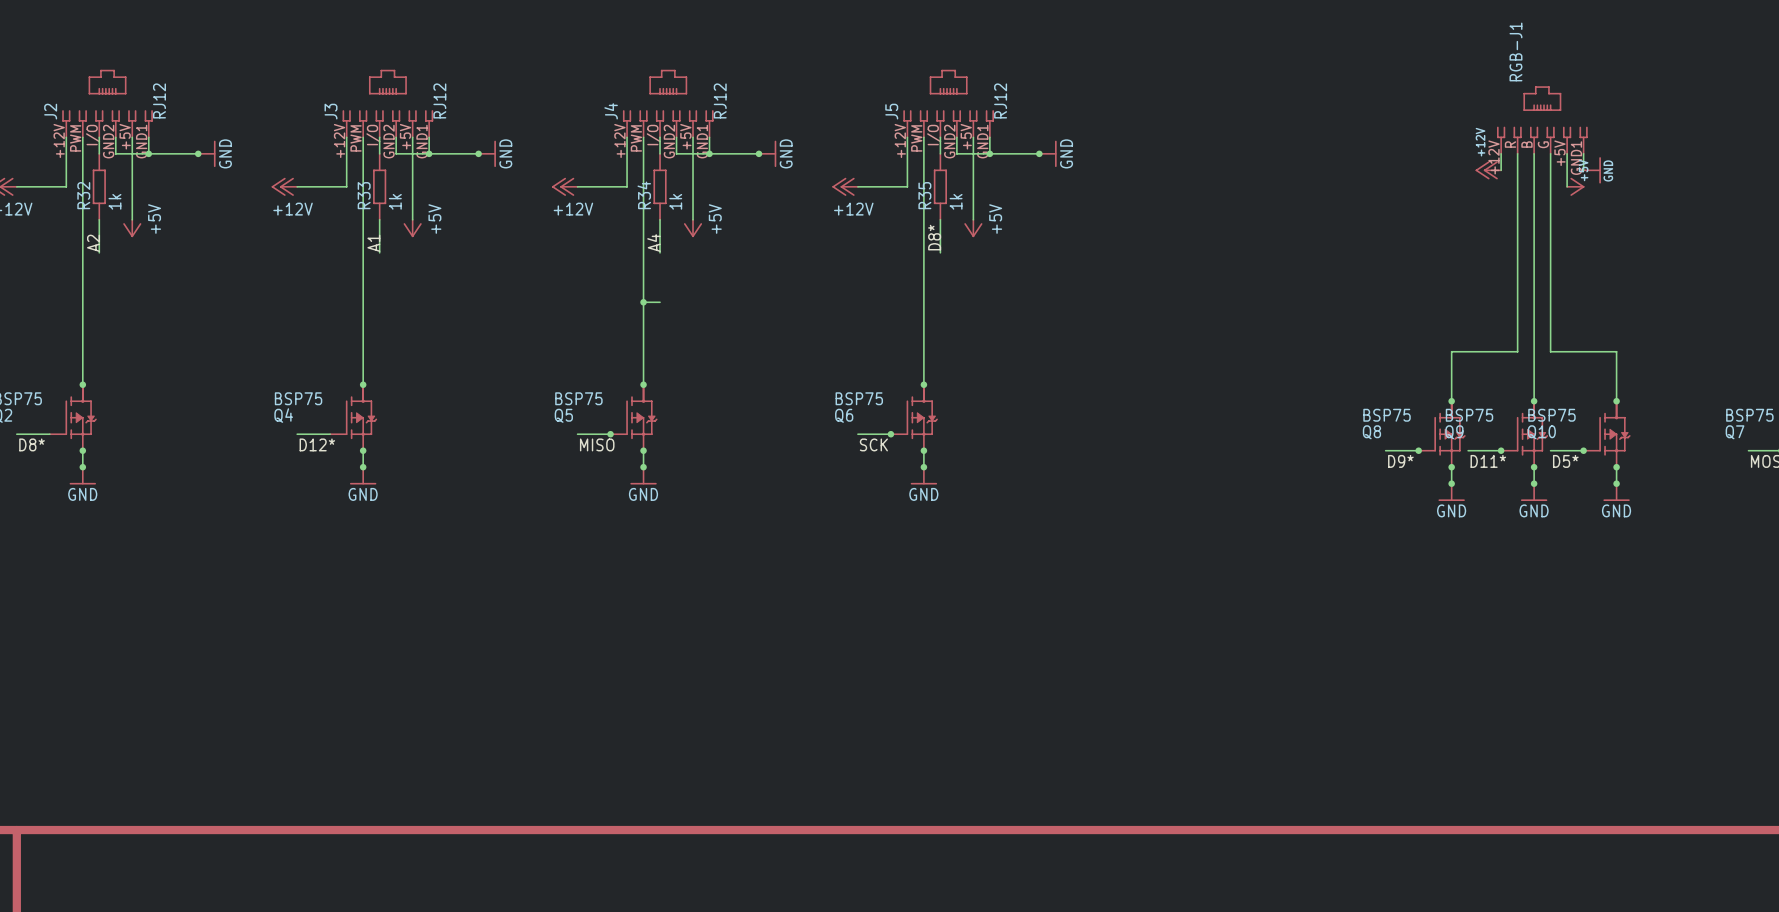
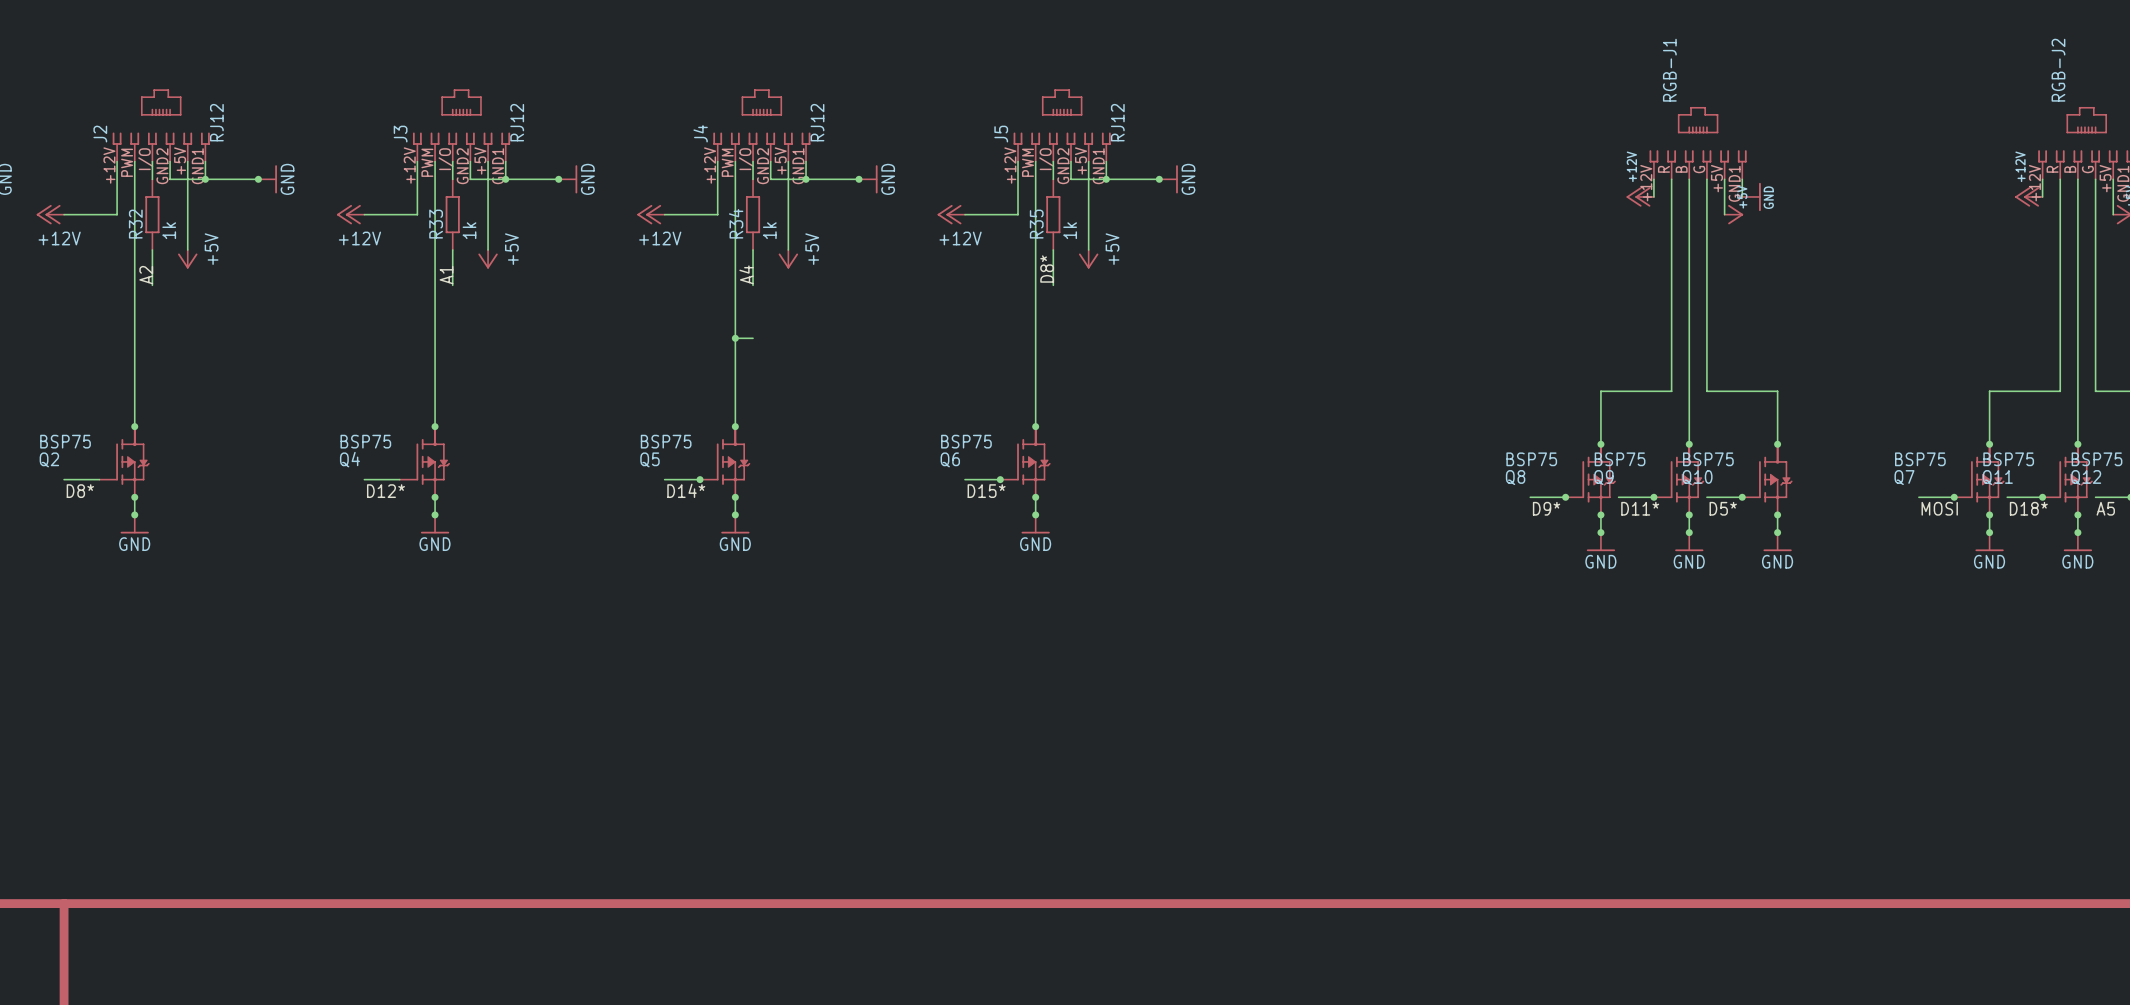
label: MISO (597, 444) -> D14* (686, 490)
label: SCK (873, 444) -> D15* (986, 491)

